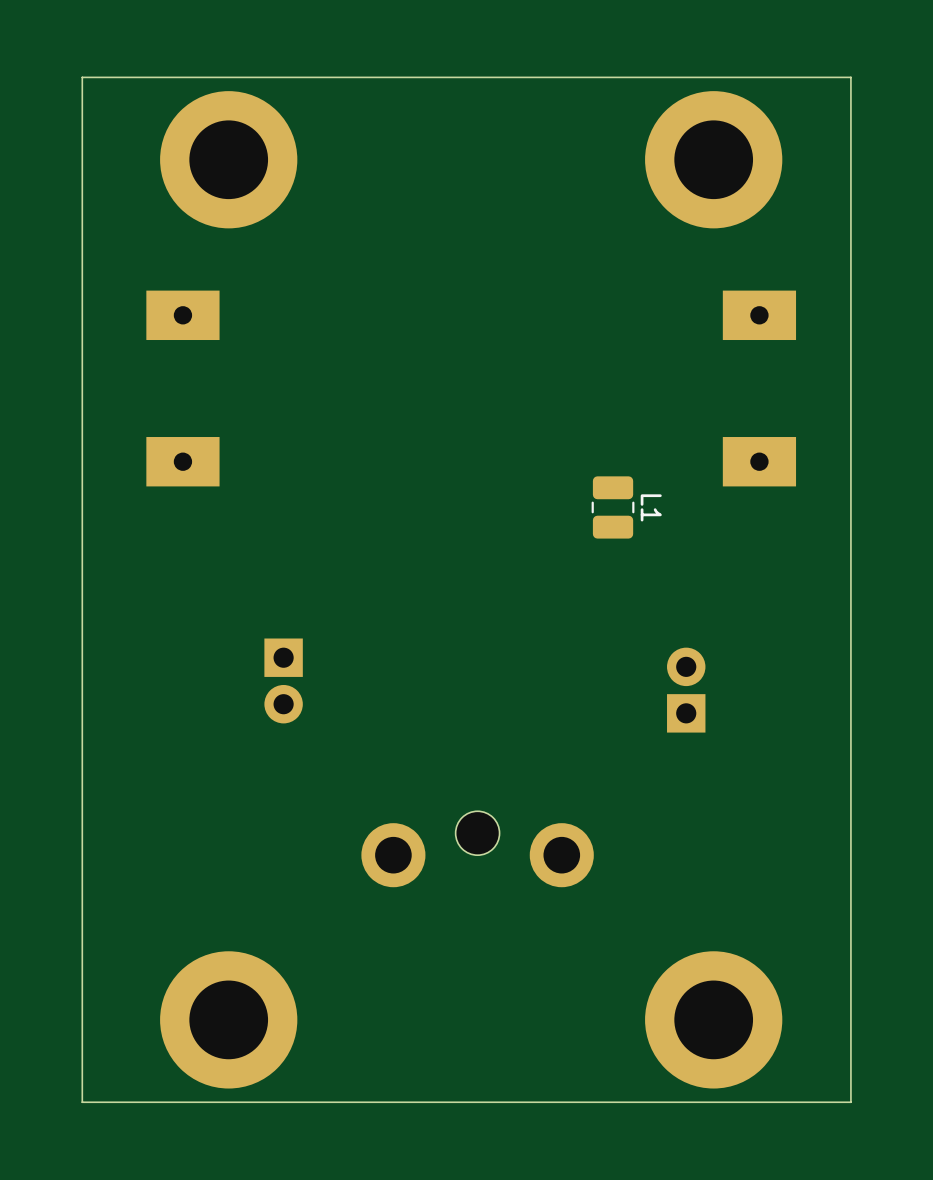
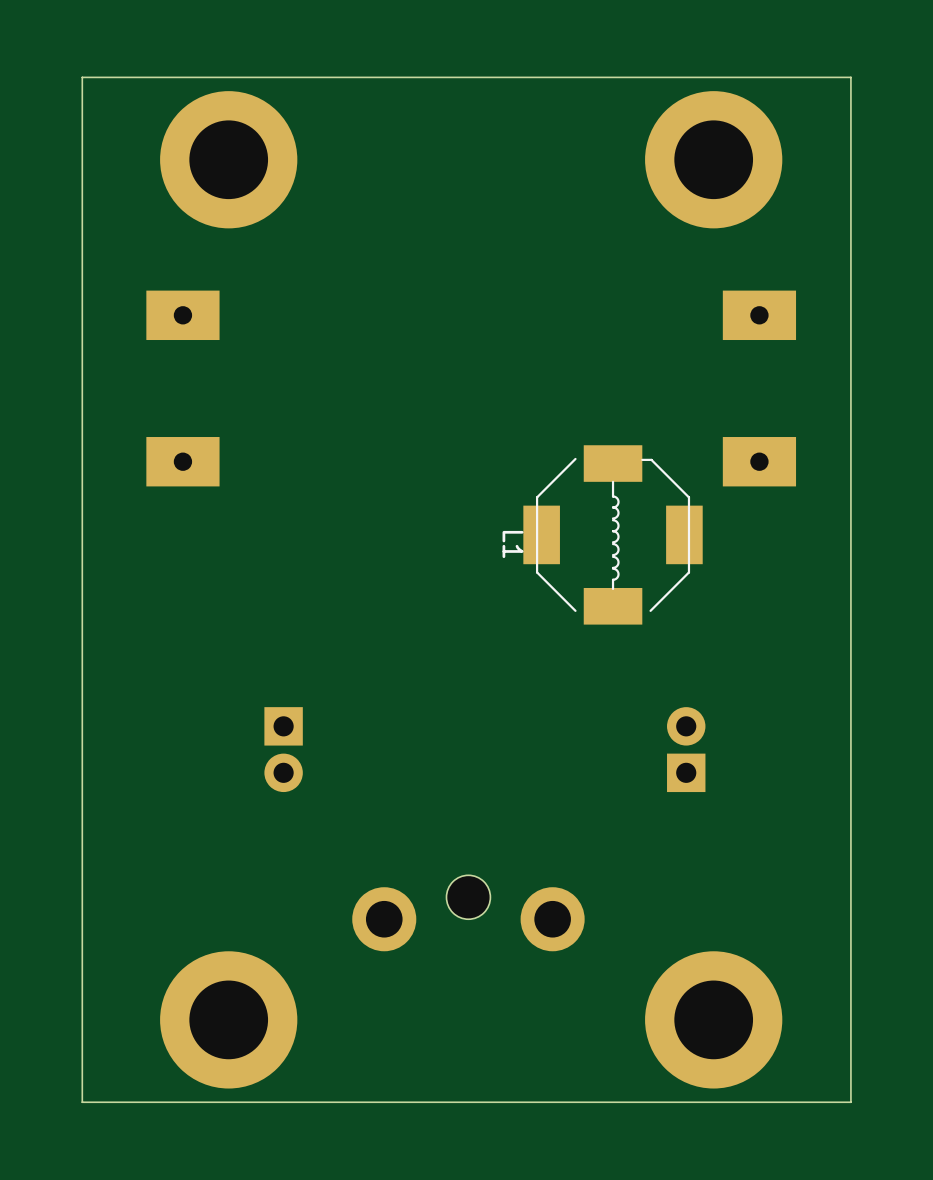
L1 footprint: [591, 476, 635, 539] -> [523, 445, 703, 625]
L1 name position: L1 (651, 507) -> L1 (513, 544)
part position: (283, 680) -> (283, 749)
part position: (686, 690) -> (686, 749)
part position: (477, 849) -> (468, 913)

